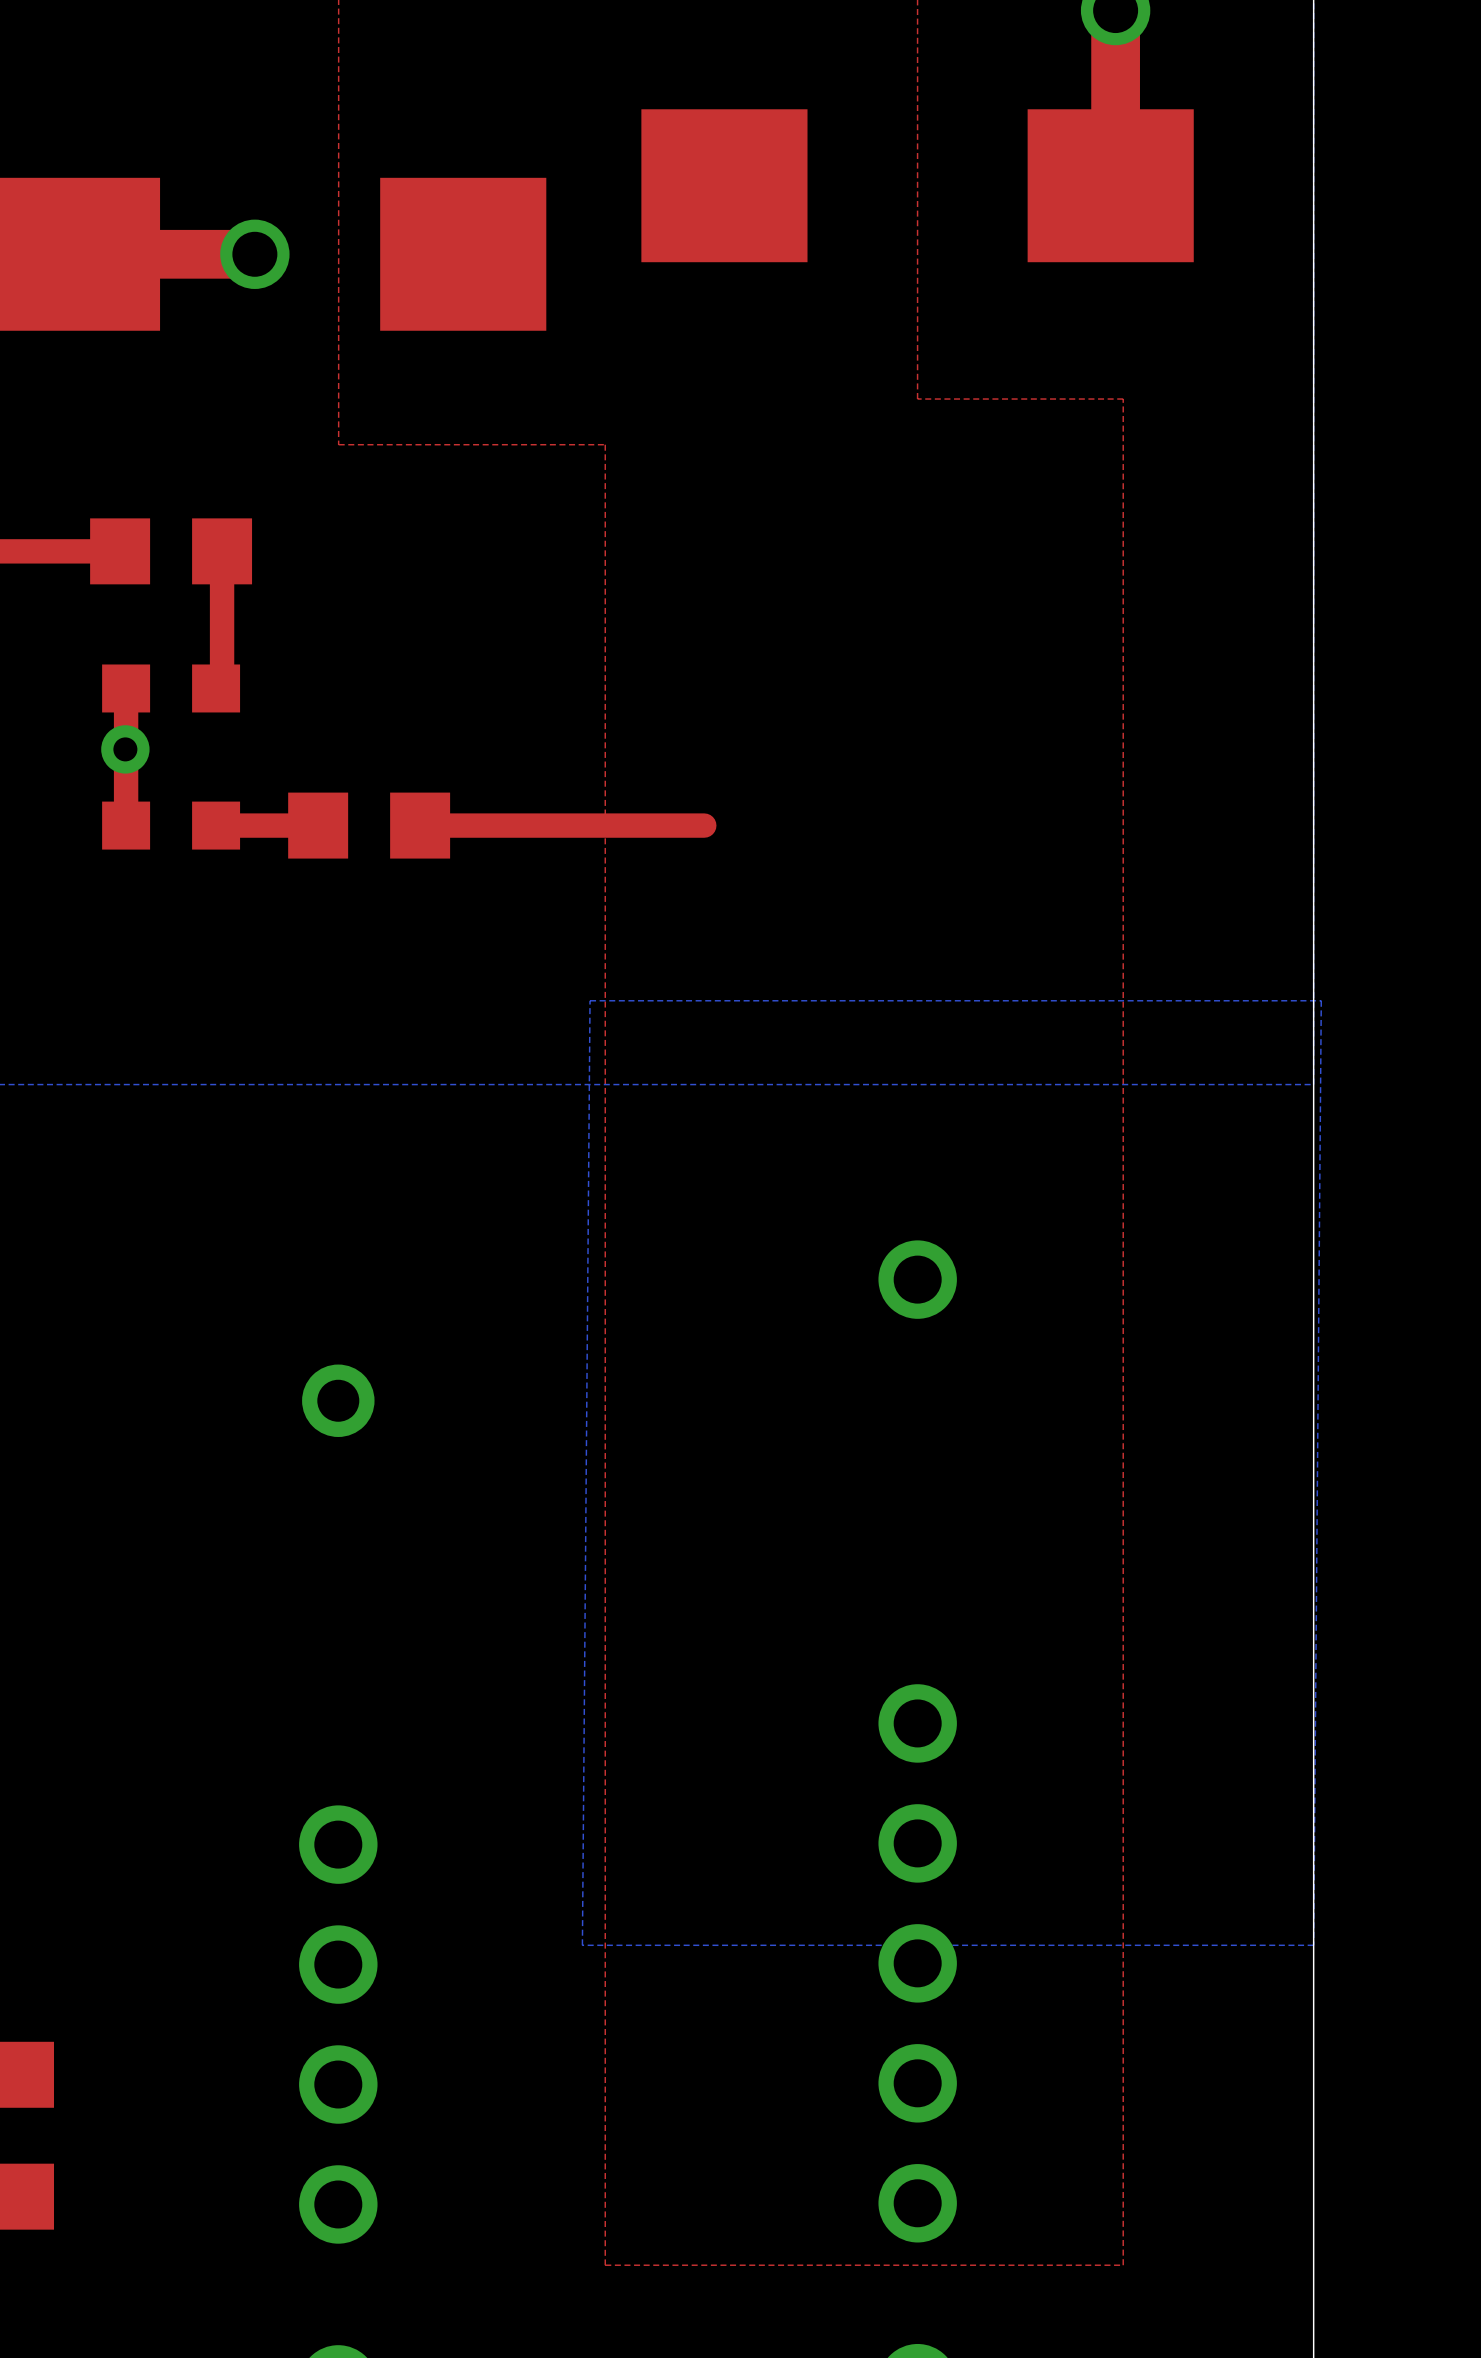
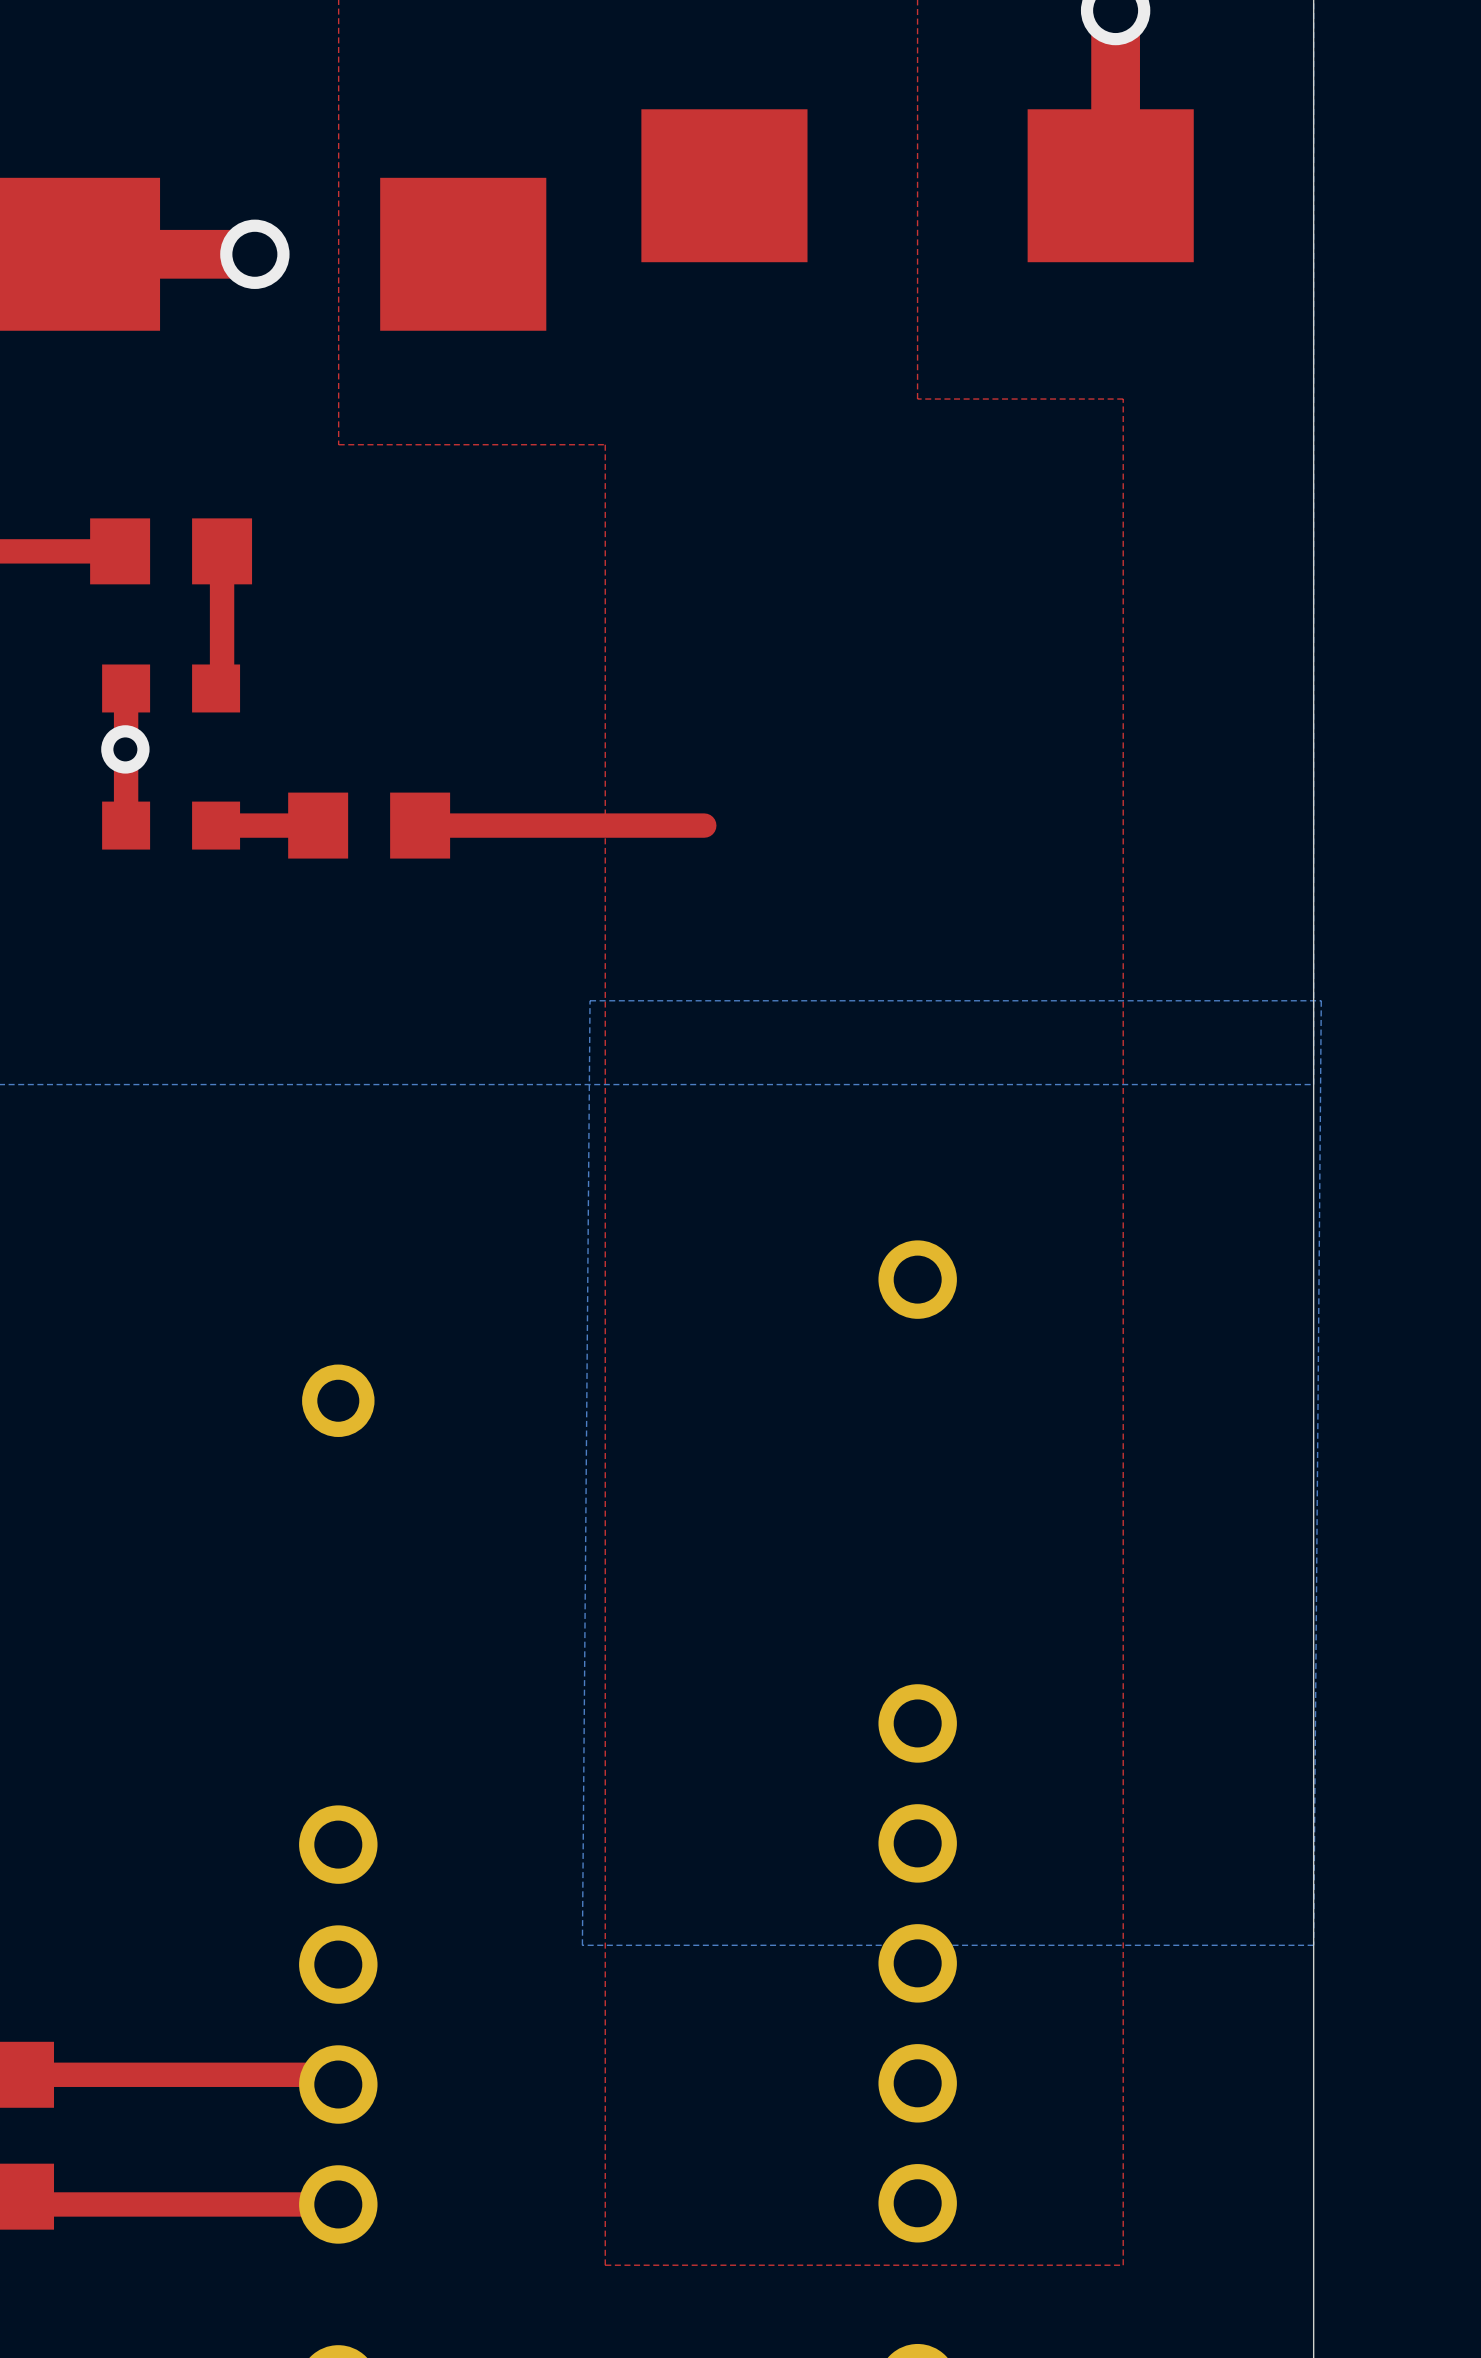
top track: none -> (24, 2074) (328, 2074) (338, 2084)
top track: none -> (24, 2196) (31, 2204) (338, 2204)

